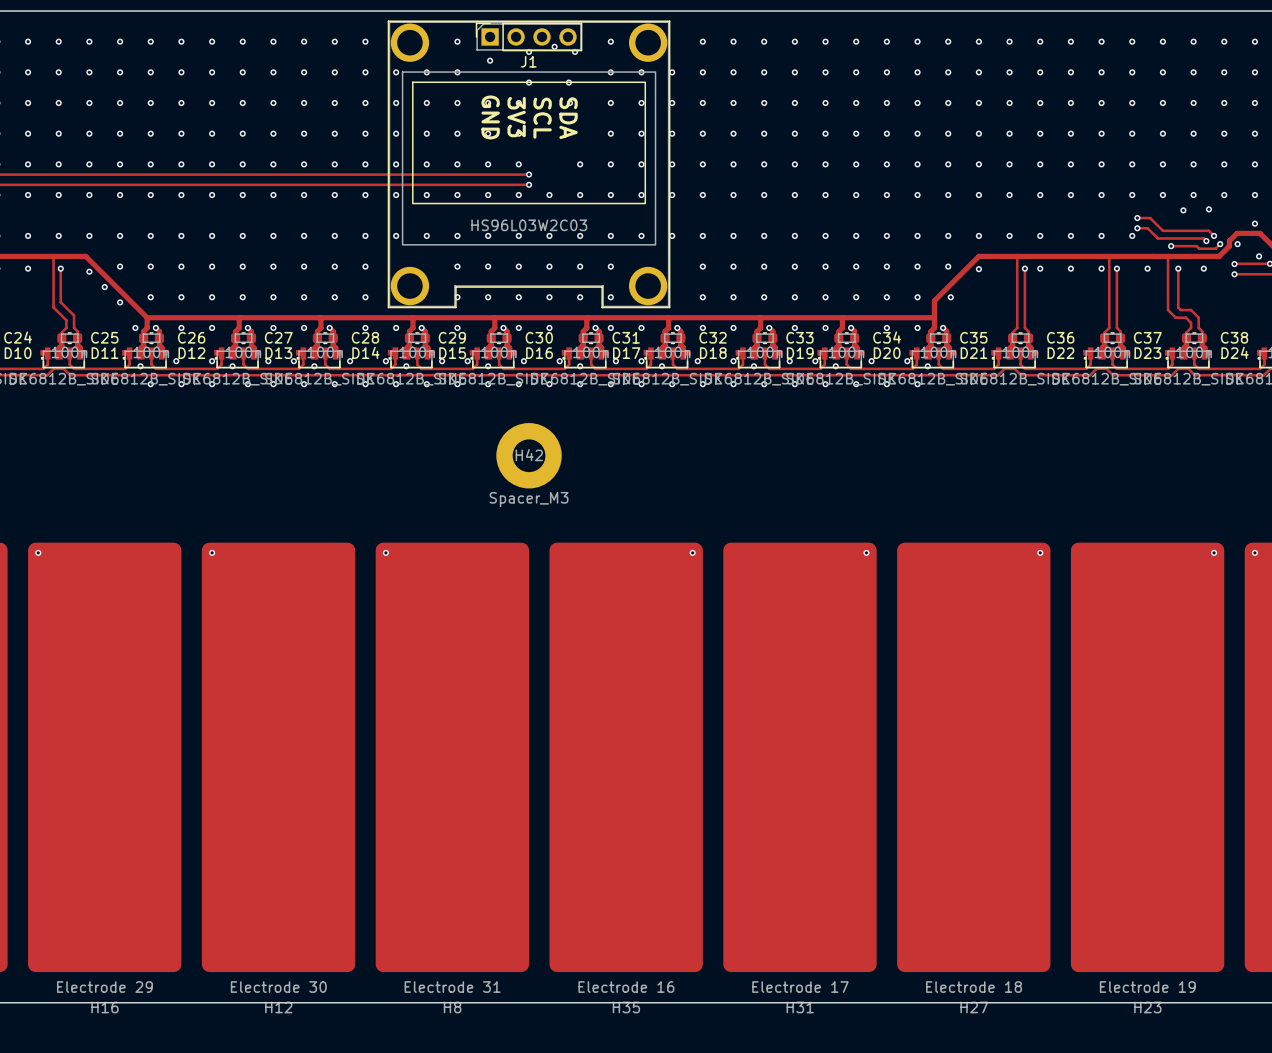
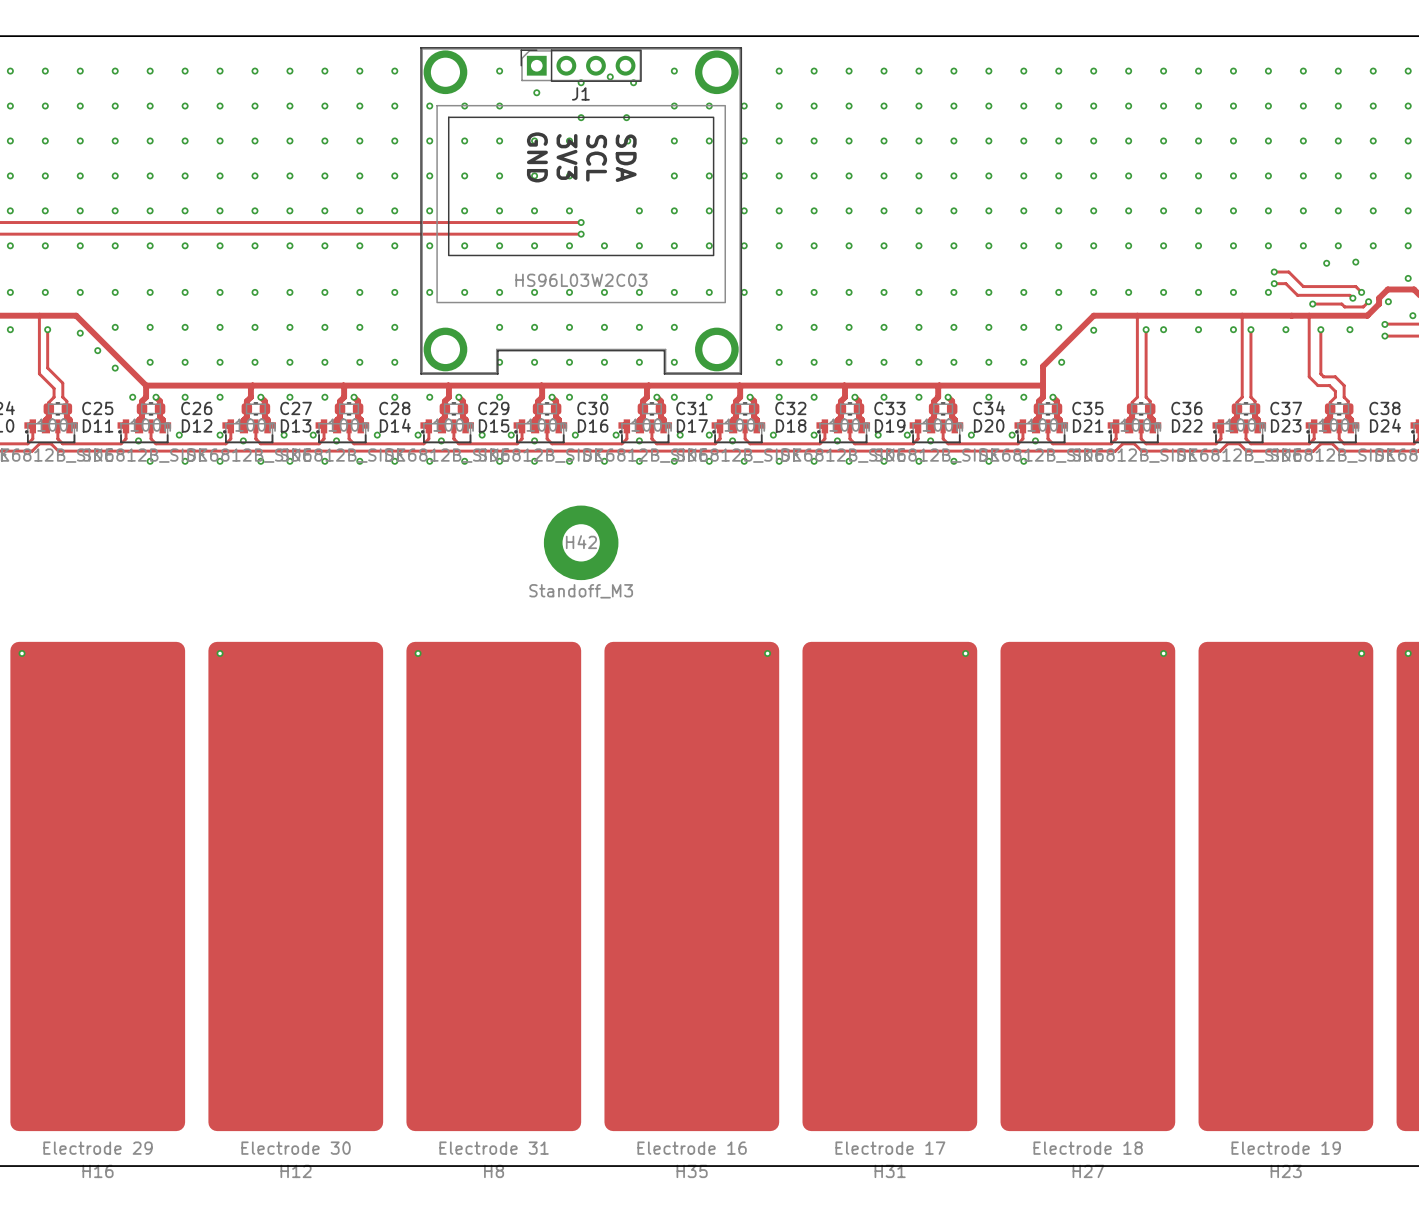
H42 value: Spacer_M3 (529, 499) -> Standoff_M3 (581, 591)

